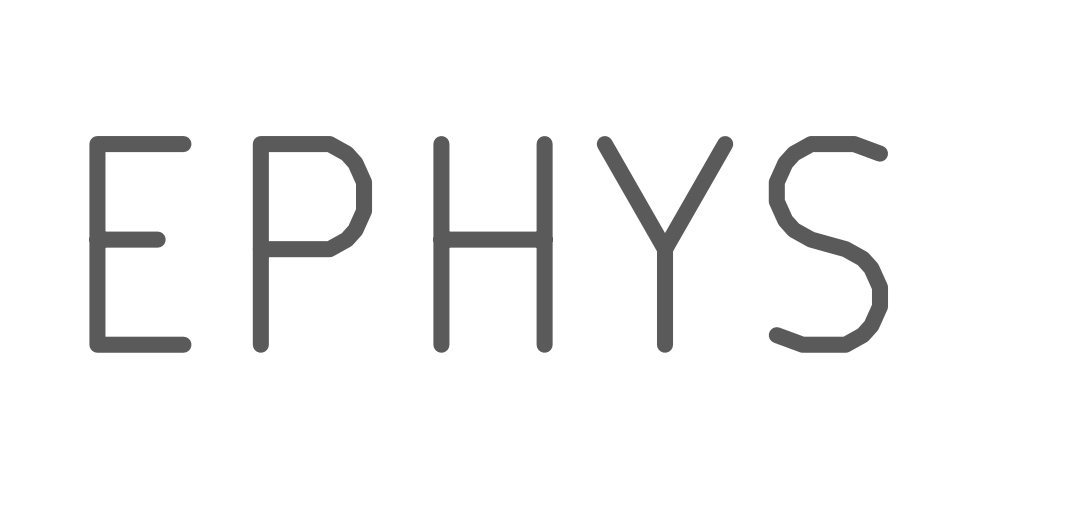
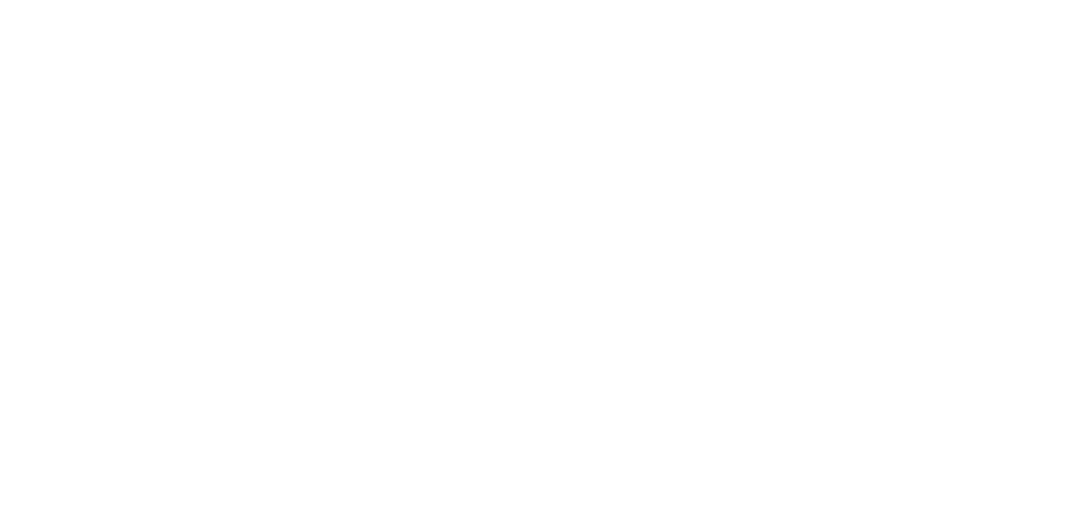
text: EPHYS (488, 244) -> none

